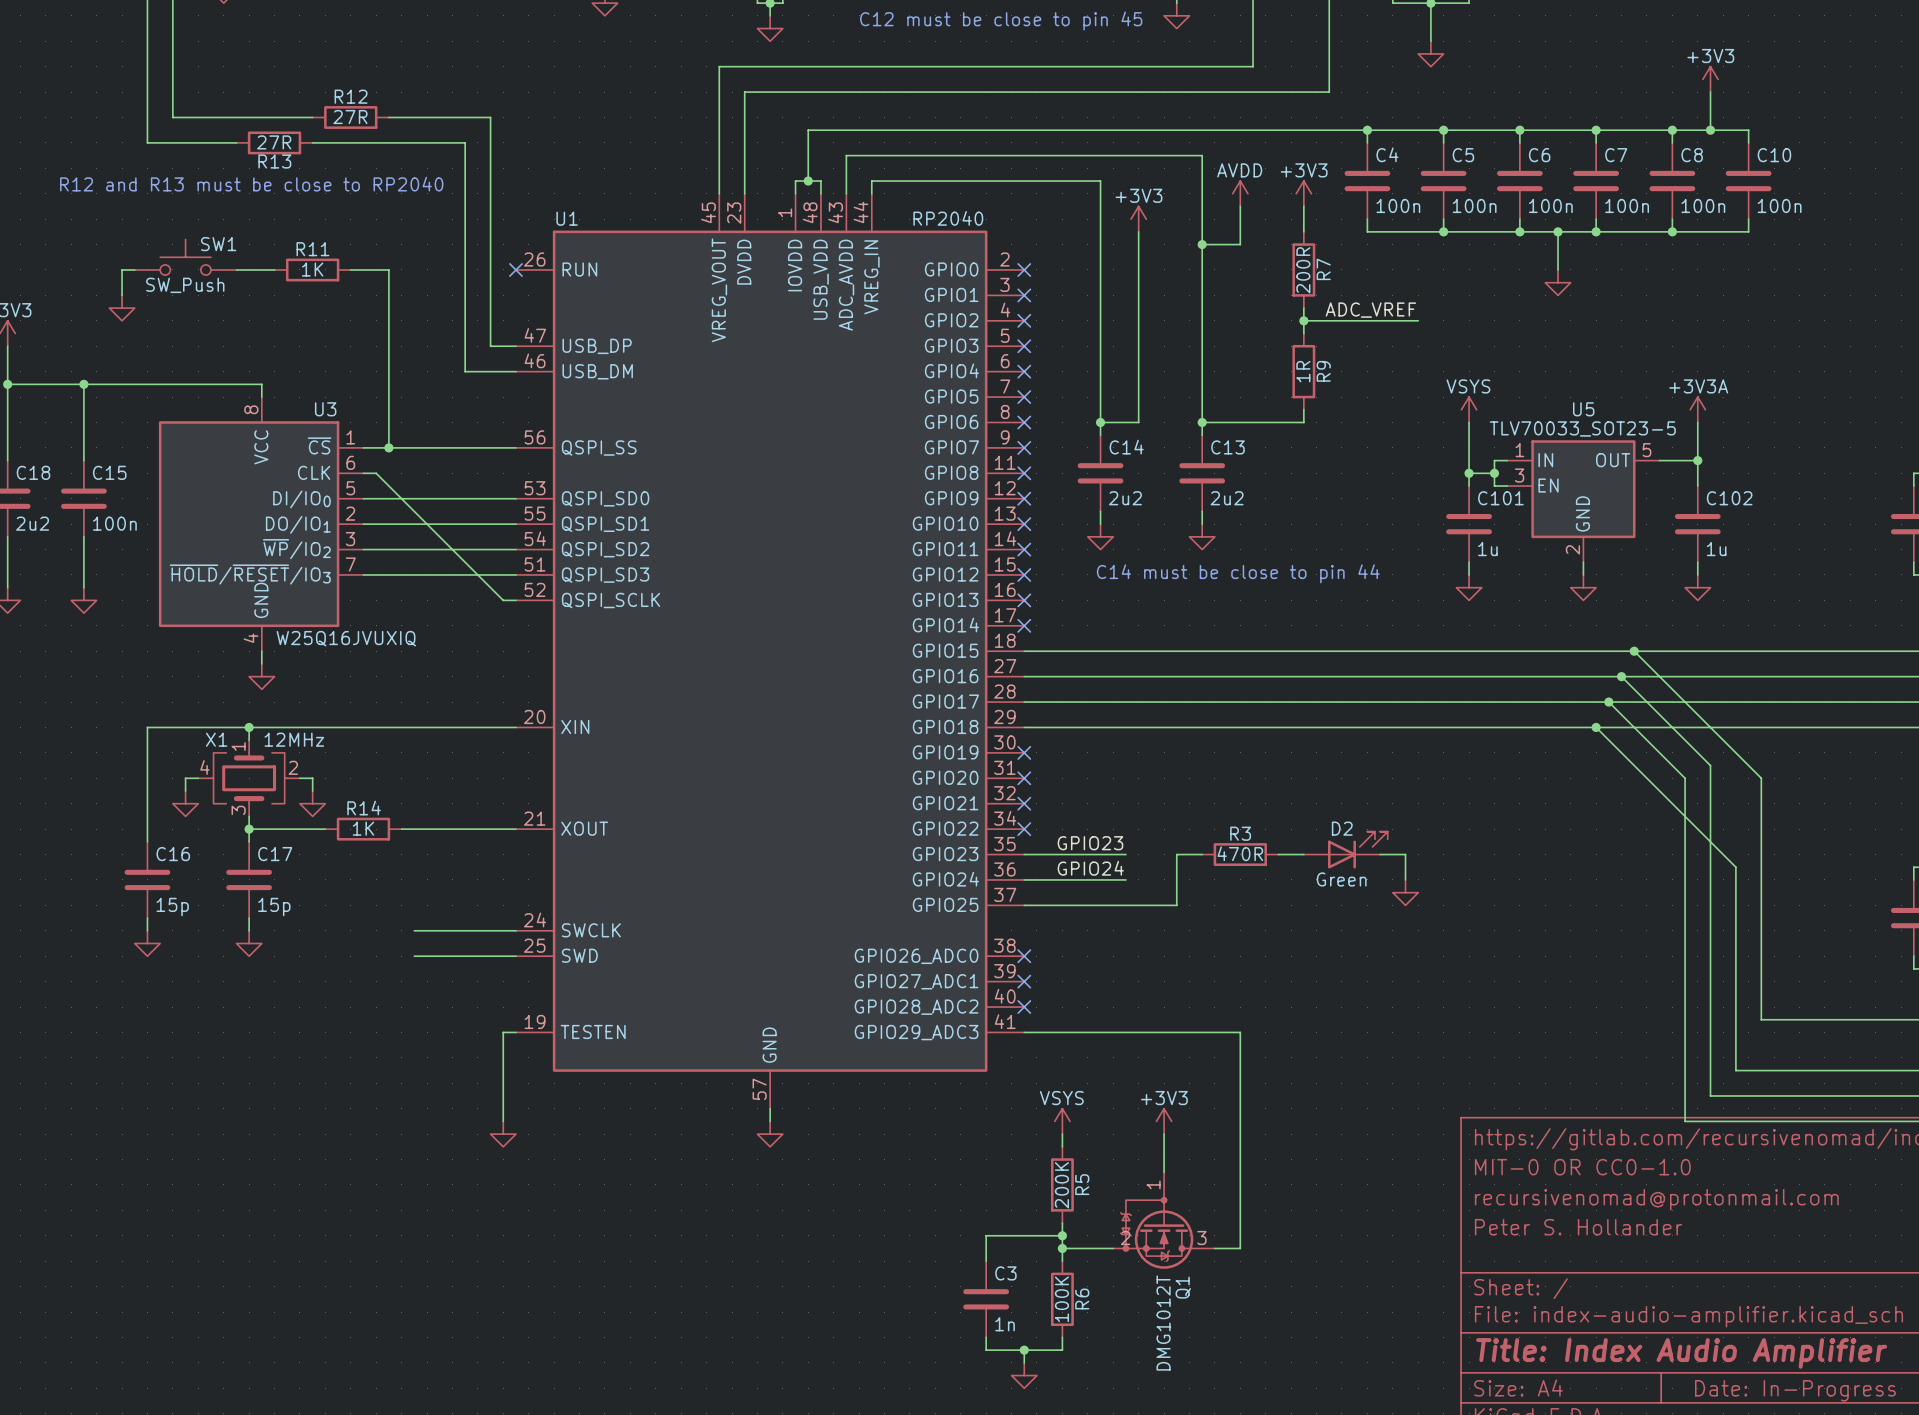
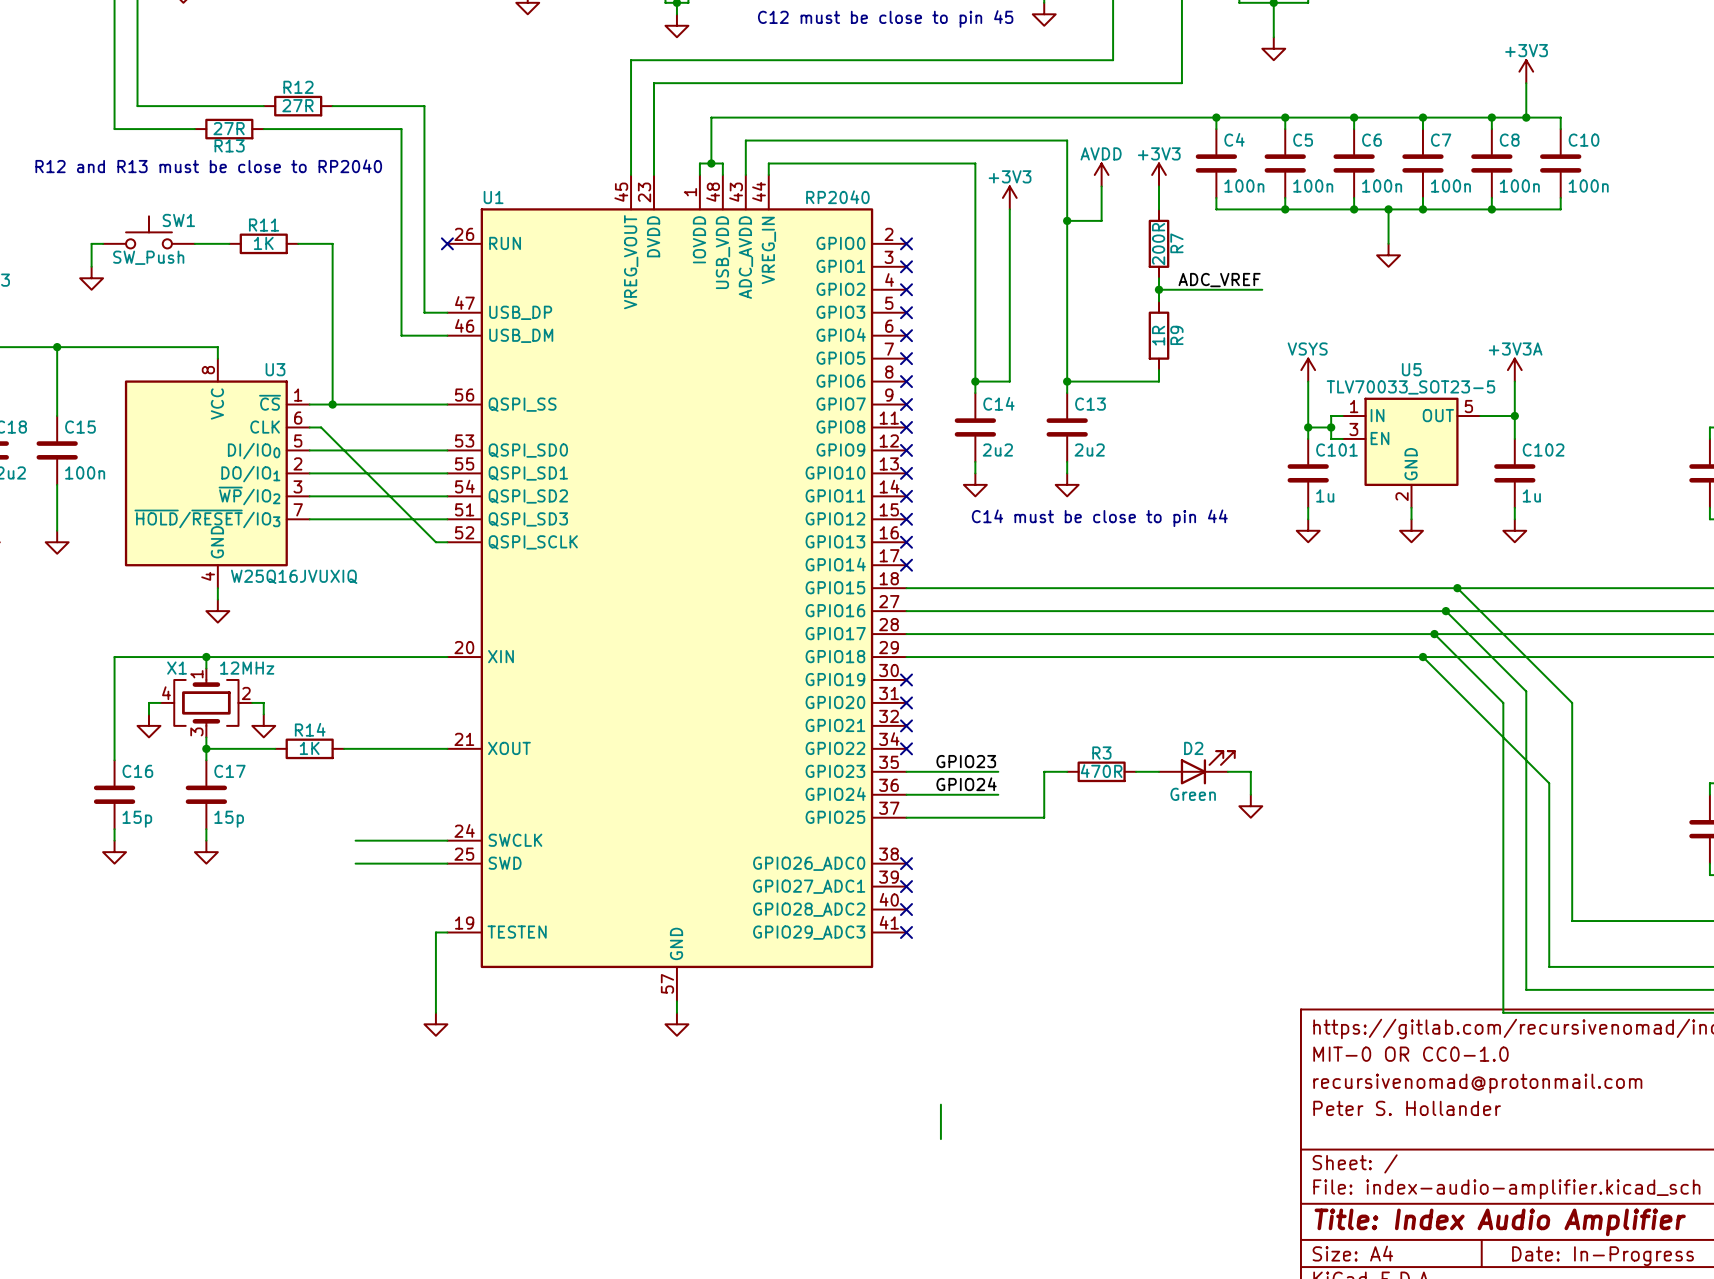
wire: (1024, 1032) (1240, 1032) (1240, 1248) (1214, 1248) -> none
no-connect mark: none -> (906, 932)
power symbol: VSYS (1062, 1121) -> none
power symbol: +3V3 (1164, 1121) -> none
wire: (1062, 1134) (1062, 1146) -> none
wire: (1164, 1134) (1164, 1172) -> none
R5: 200K (1062, 1184) -> none
Q1: DMG1012T (1164, 1220) -> none
wire: (1062, 1235) (986, 1235) (986, 1261) -> none
junction: (1062, 1235) -> none
wire: (1062, 1248) (1113, 1248) -> none
junction: (1062, 1248) -> none
C3: 1n (986, 1299) -> none
R6: 100K (1062, 1299) -> none
wire: (986, 1337) (986, 1350) (1062, 1350) (1062, 1337) -> none
wire: (1024, 1350) (1024, 1362) -> none
junction: (1024, 1350) -> none
power symbol: (1024, 1375) -> none

